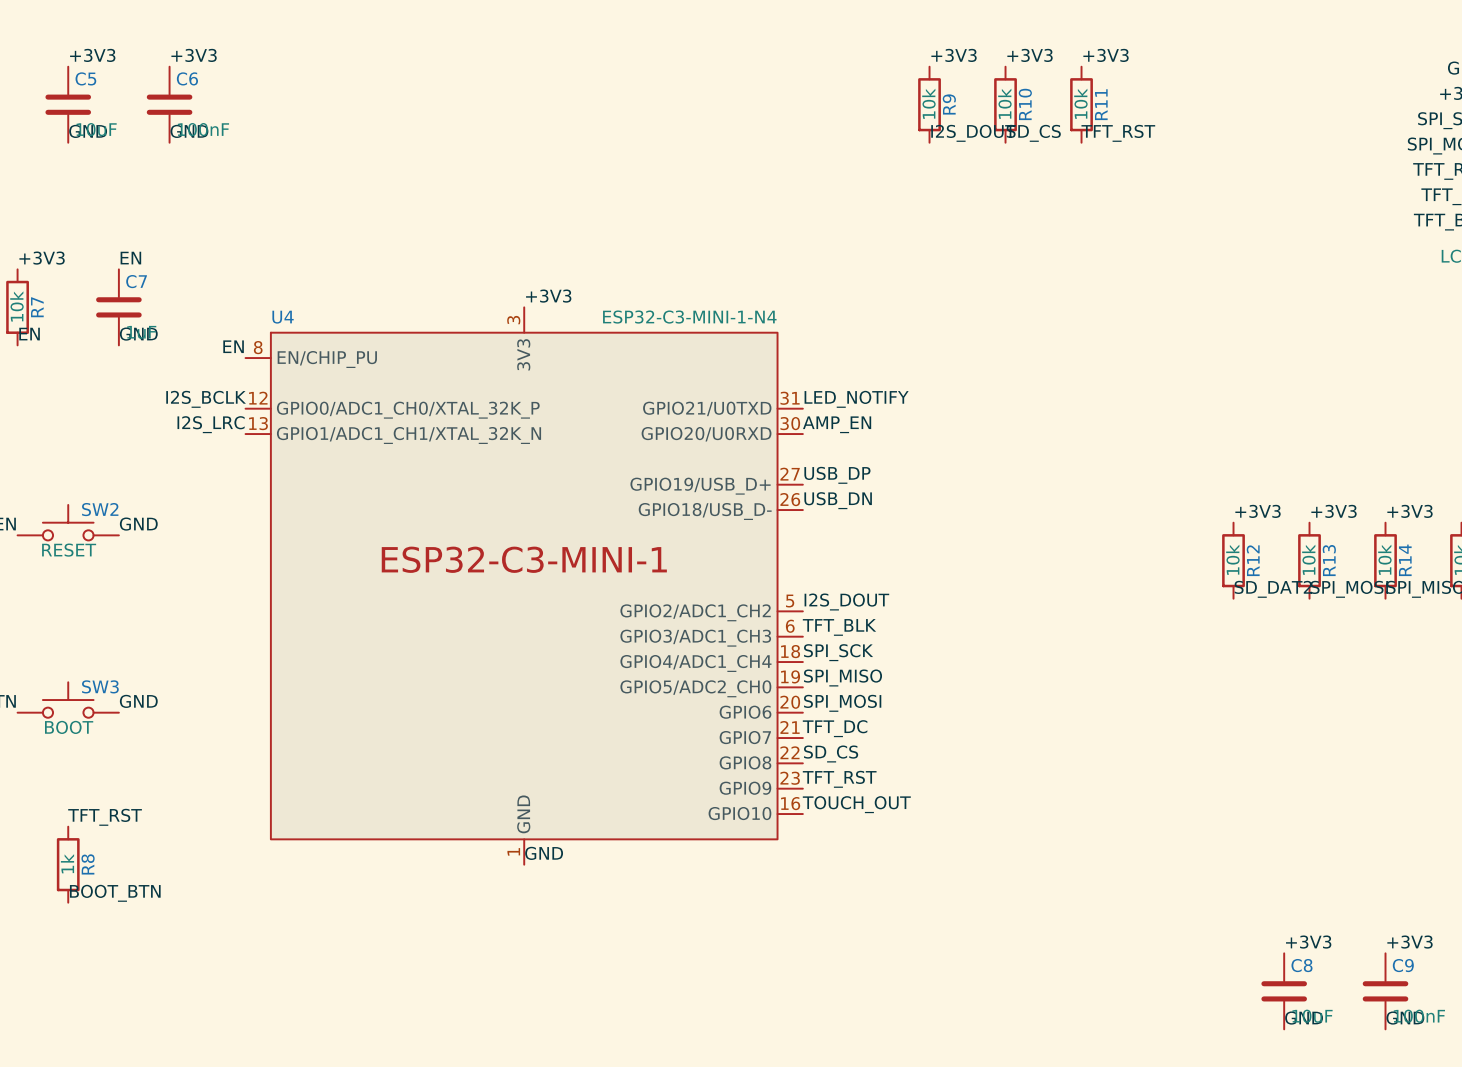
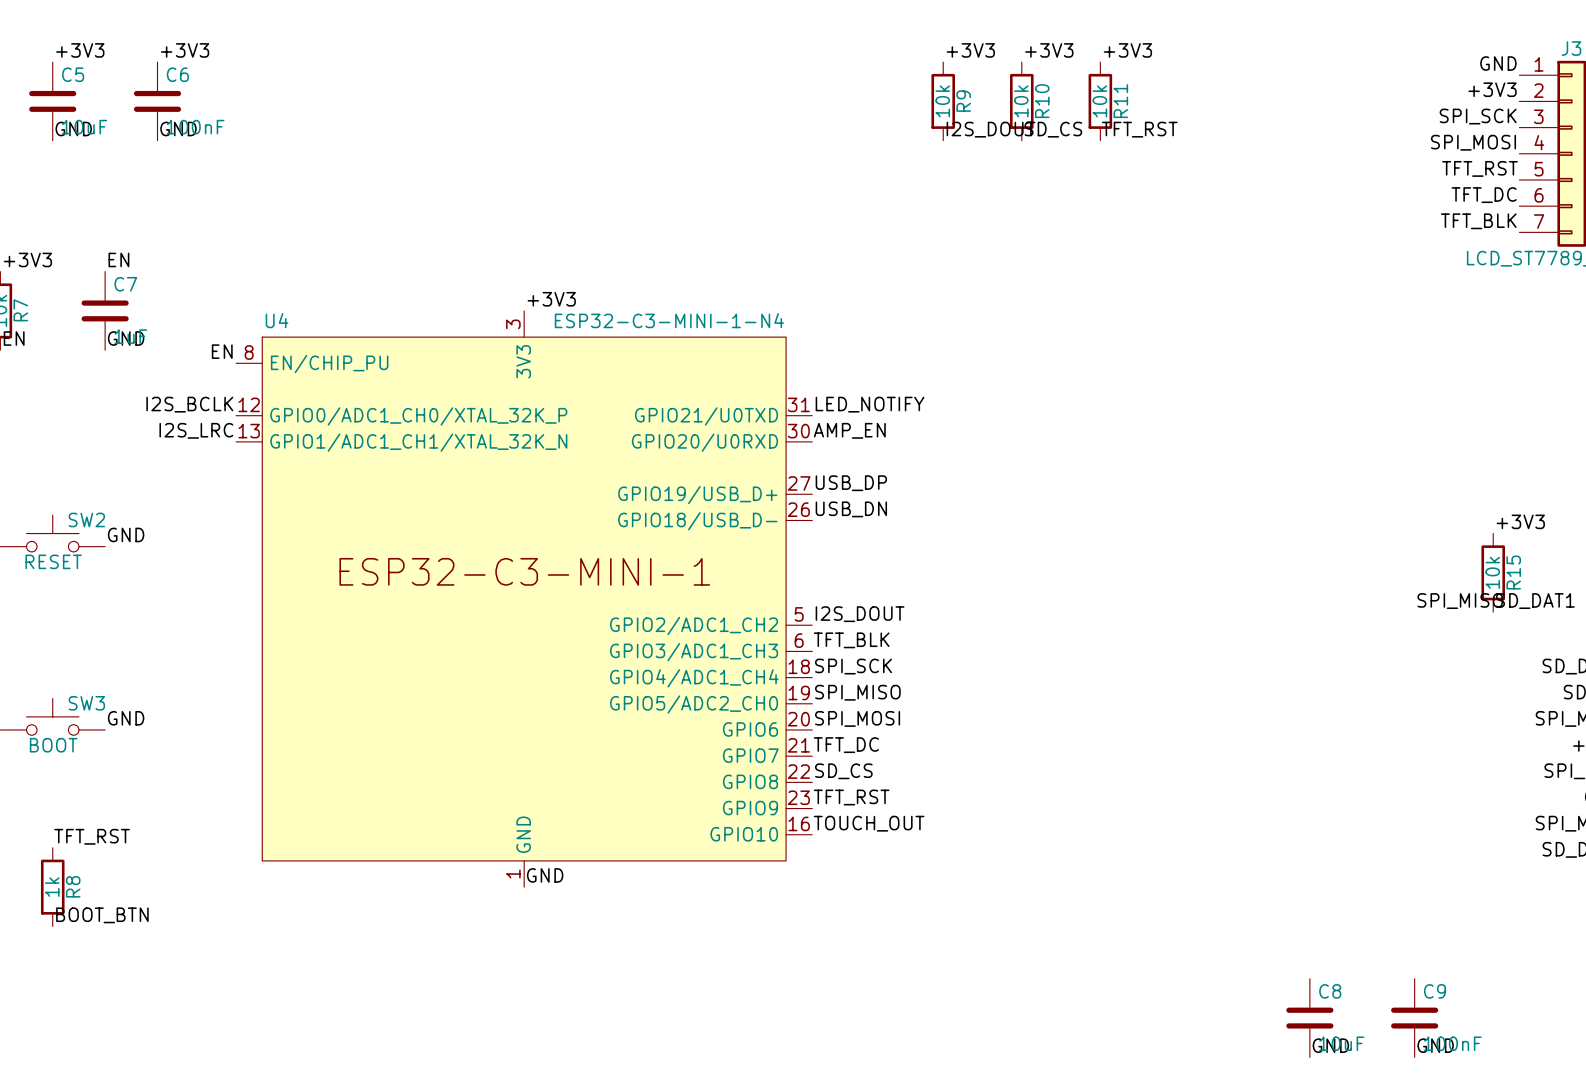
label: +3V3 (1258, 511) -> none
label: +3V3 (1334, 511) -> none
label: +3V3 (1410, 511) -> none
R12: 10k (1233, 560) -> none
R13: 10k (1309, 560) -> none
R14: 10k (1385, 560) -> none
label: SD_DAT2 (1273, 589) -> none
label: SPI_MOSI (1349, 589) -> none
label: +3V3 (1308, 942) -> none
label: +3V3 (1410, 942) -> none

